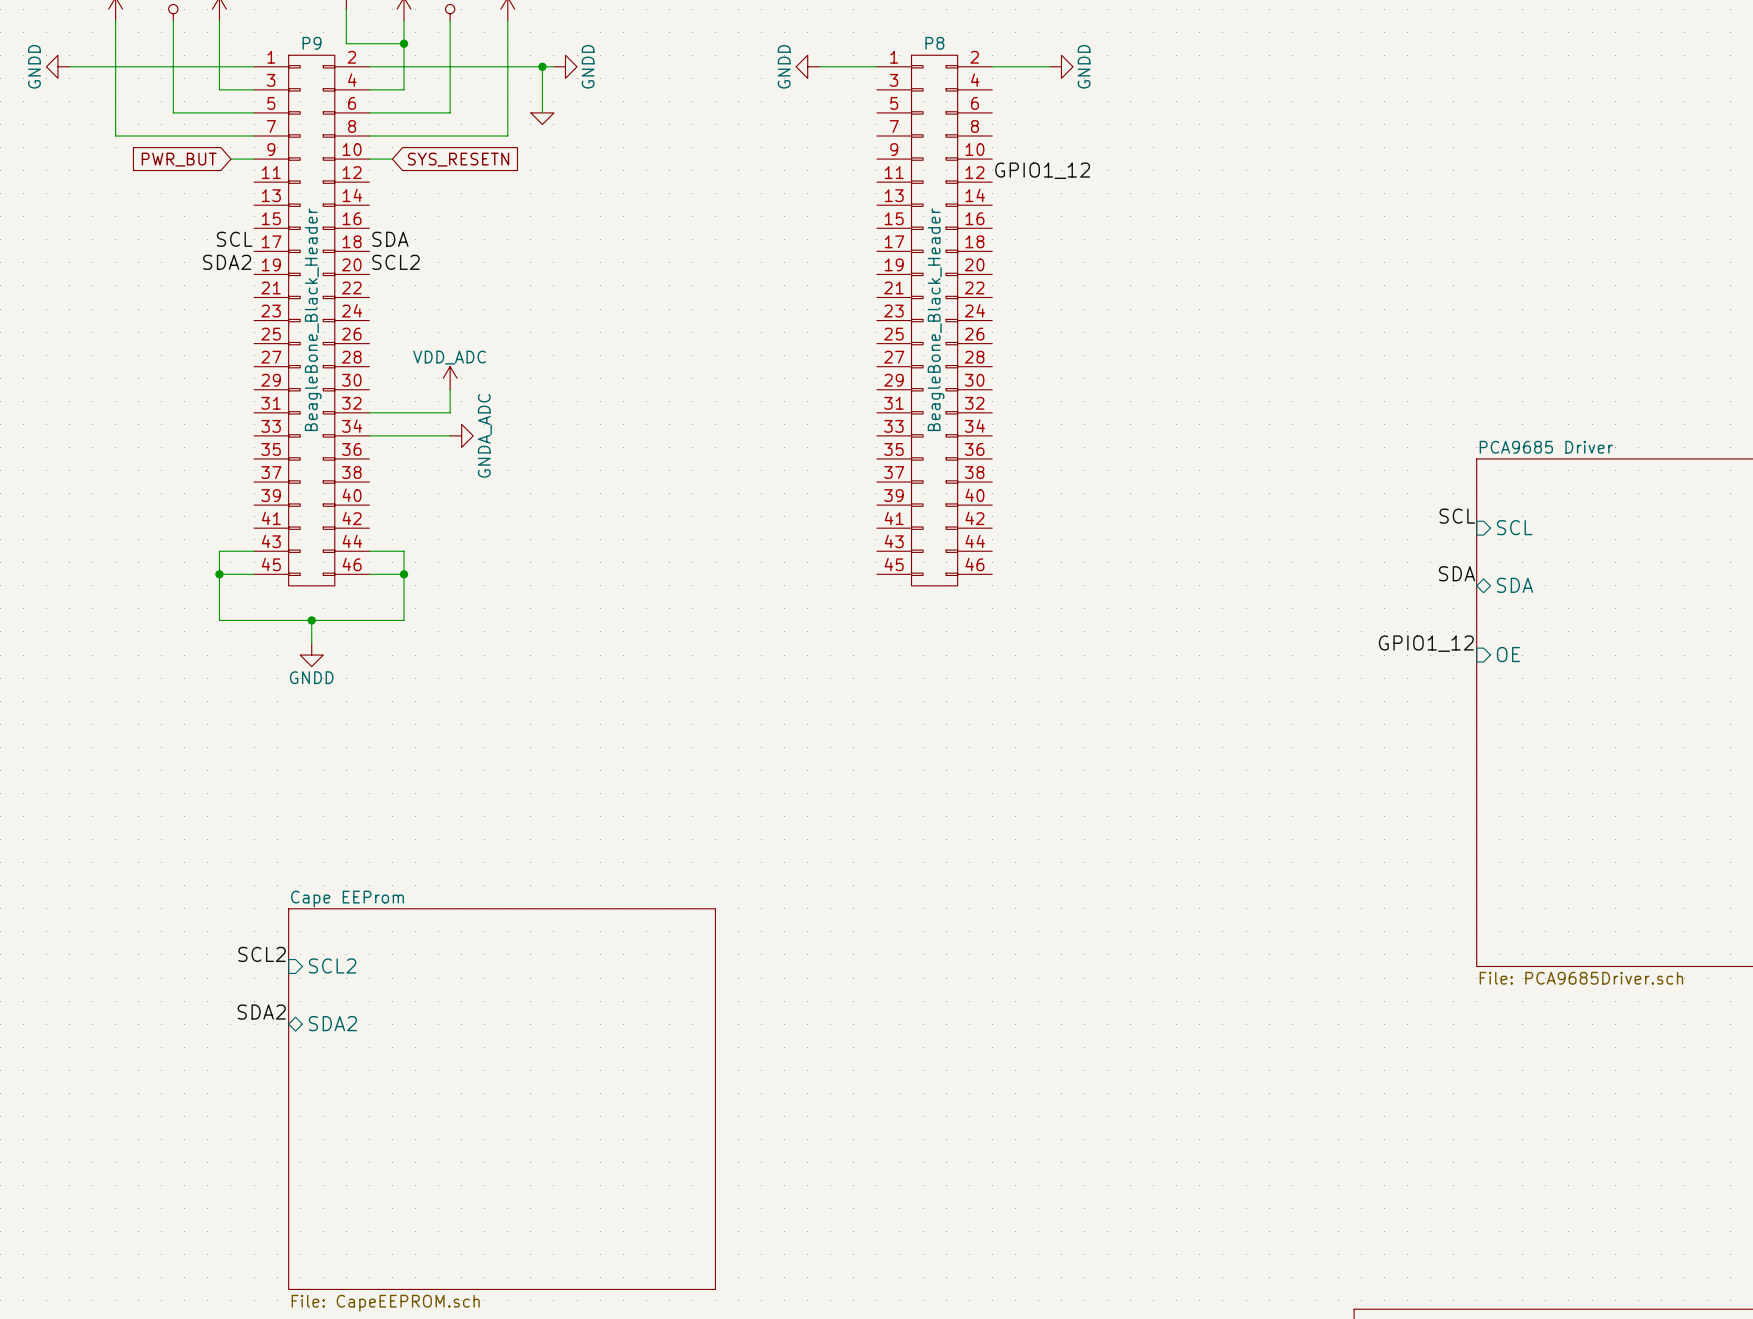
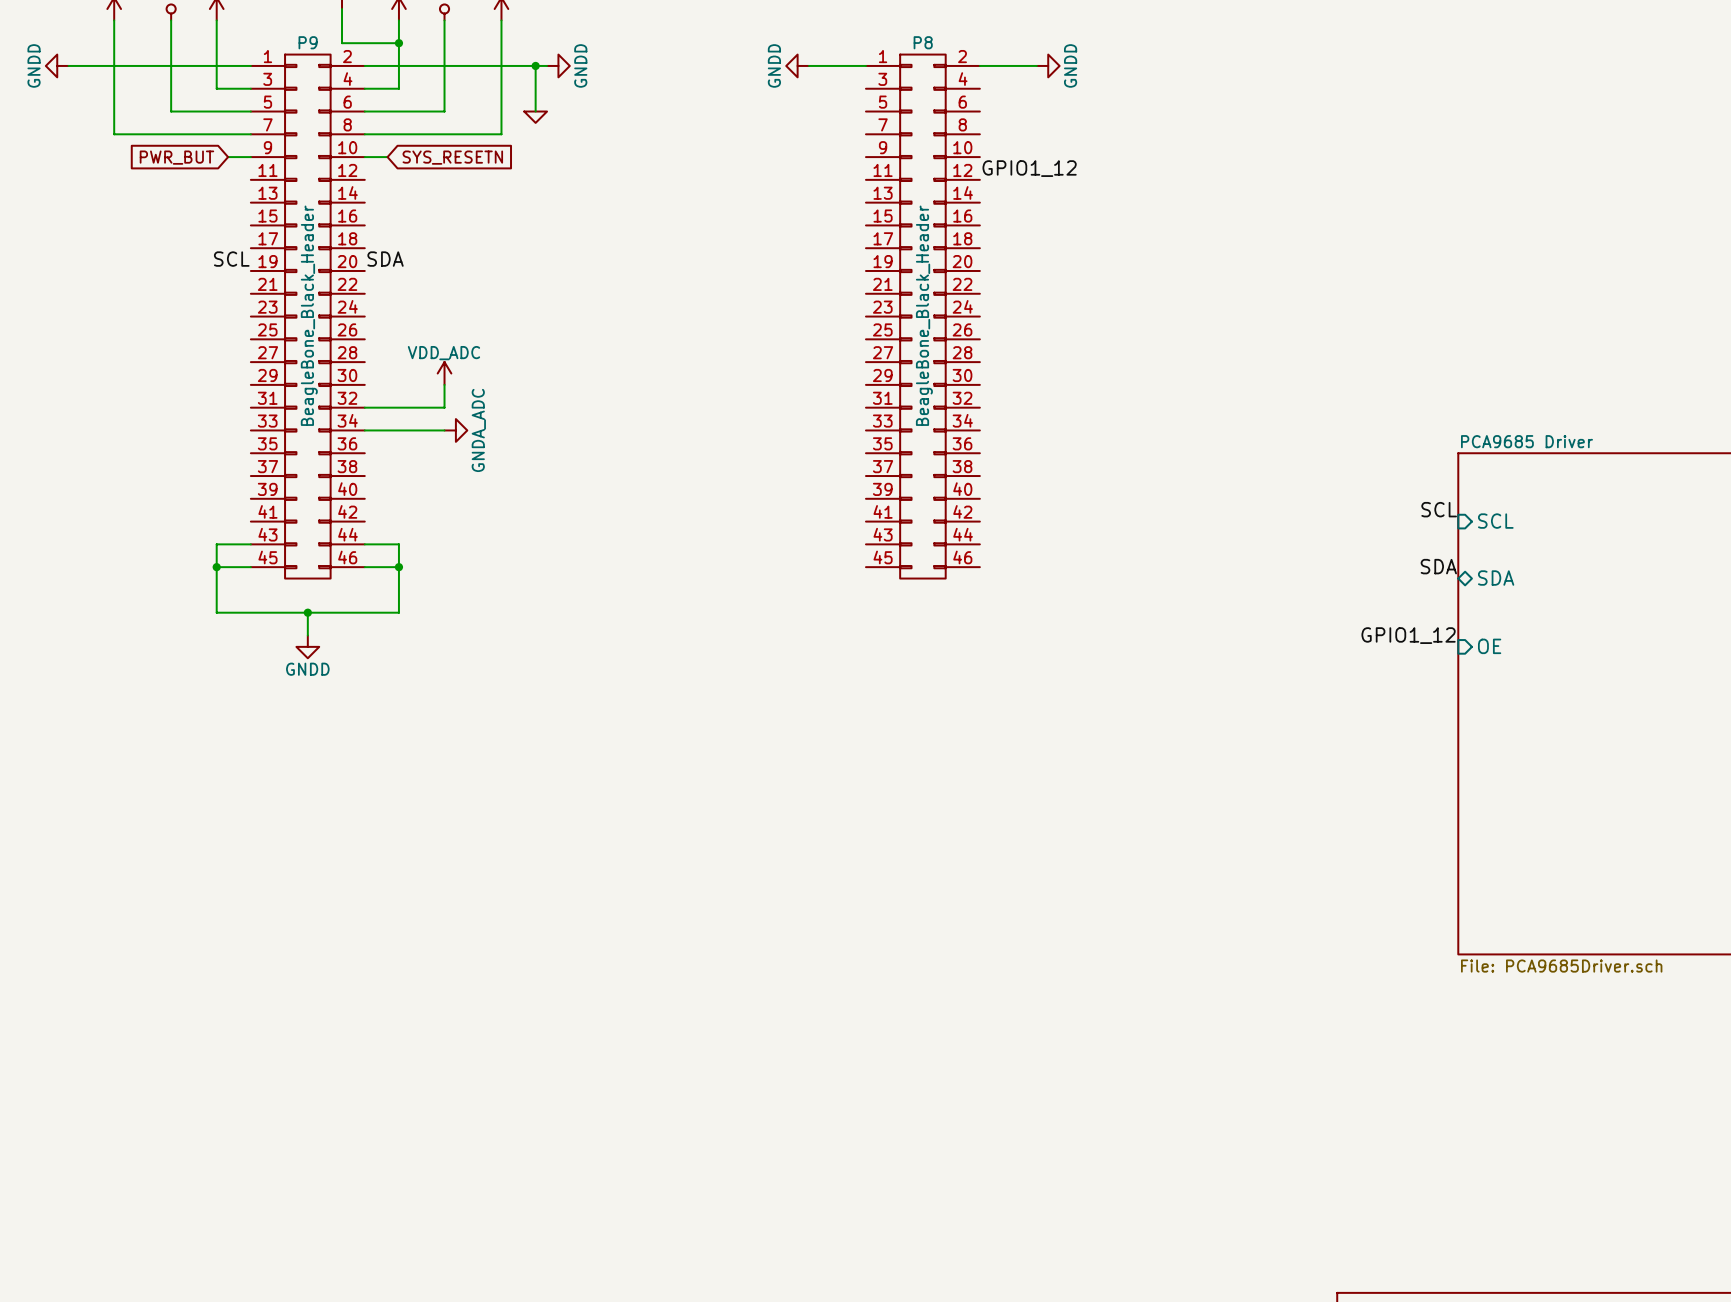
label: SCL (234, 239) -> none
label: SDA (390, 239) -> none
label: SDA2 (227, 262) -> SCL (231, 259)
label: SCL2 (396, 262) -> SDA (385, 259)
label: SCL2 (262, 954) -> none
sheet pin: SCL2 (332, 965) -> none
label: SDA2 (261, 1012) -> none
sheet pin: SDA2 (332, 1023) -> none
sheet Cape EEProm: File: CapeEEPROM.sch (502, 1099) -> none

